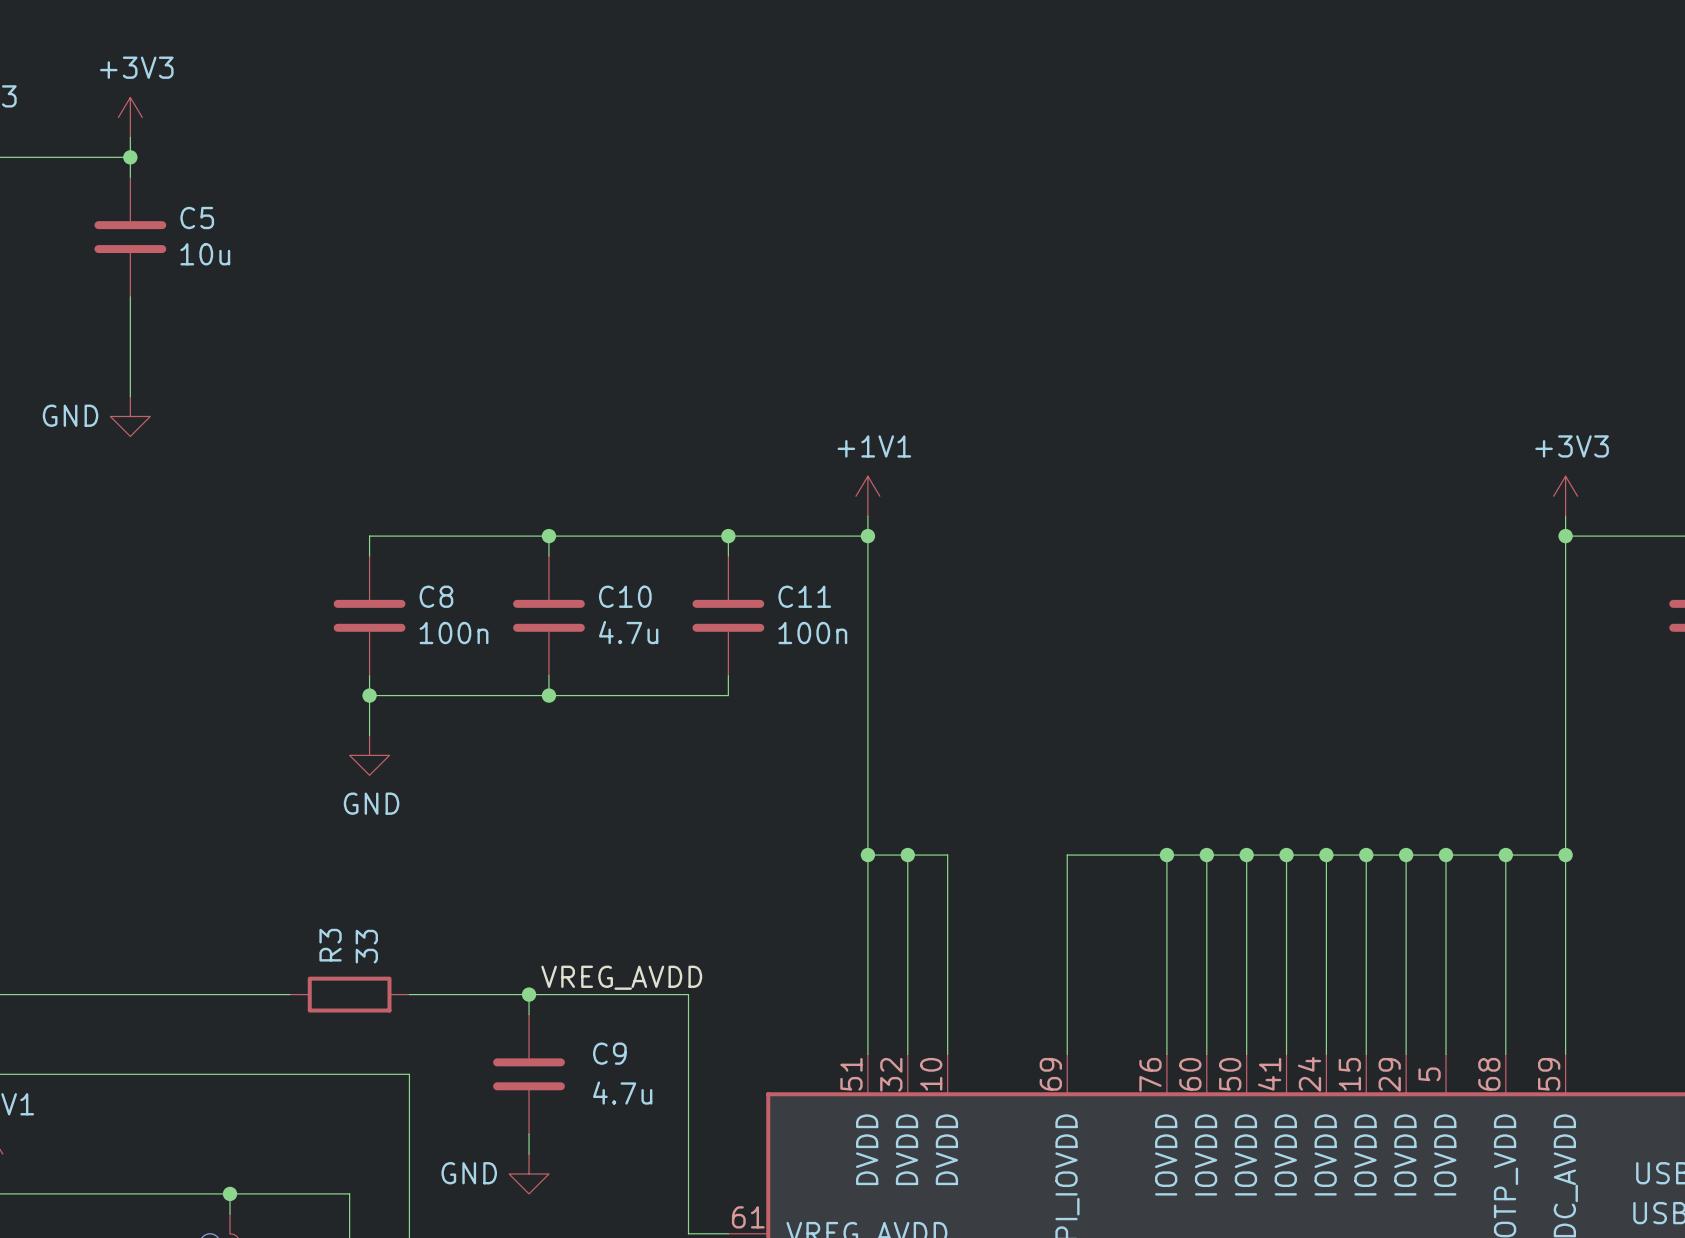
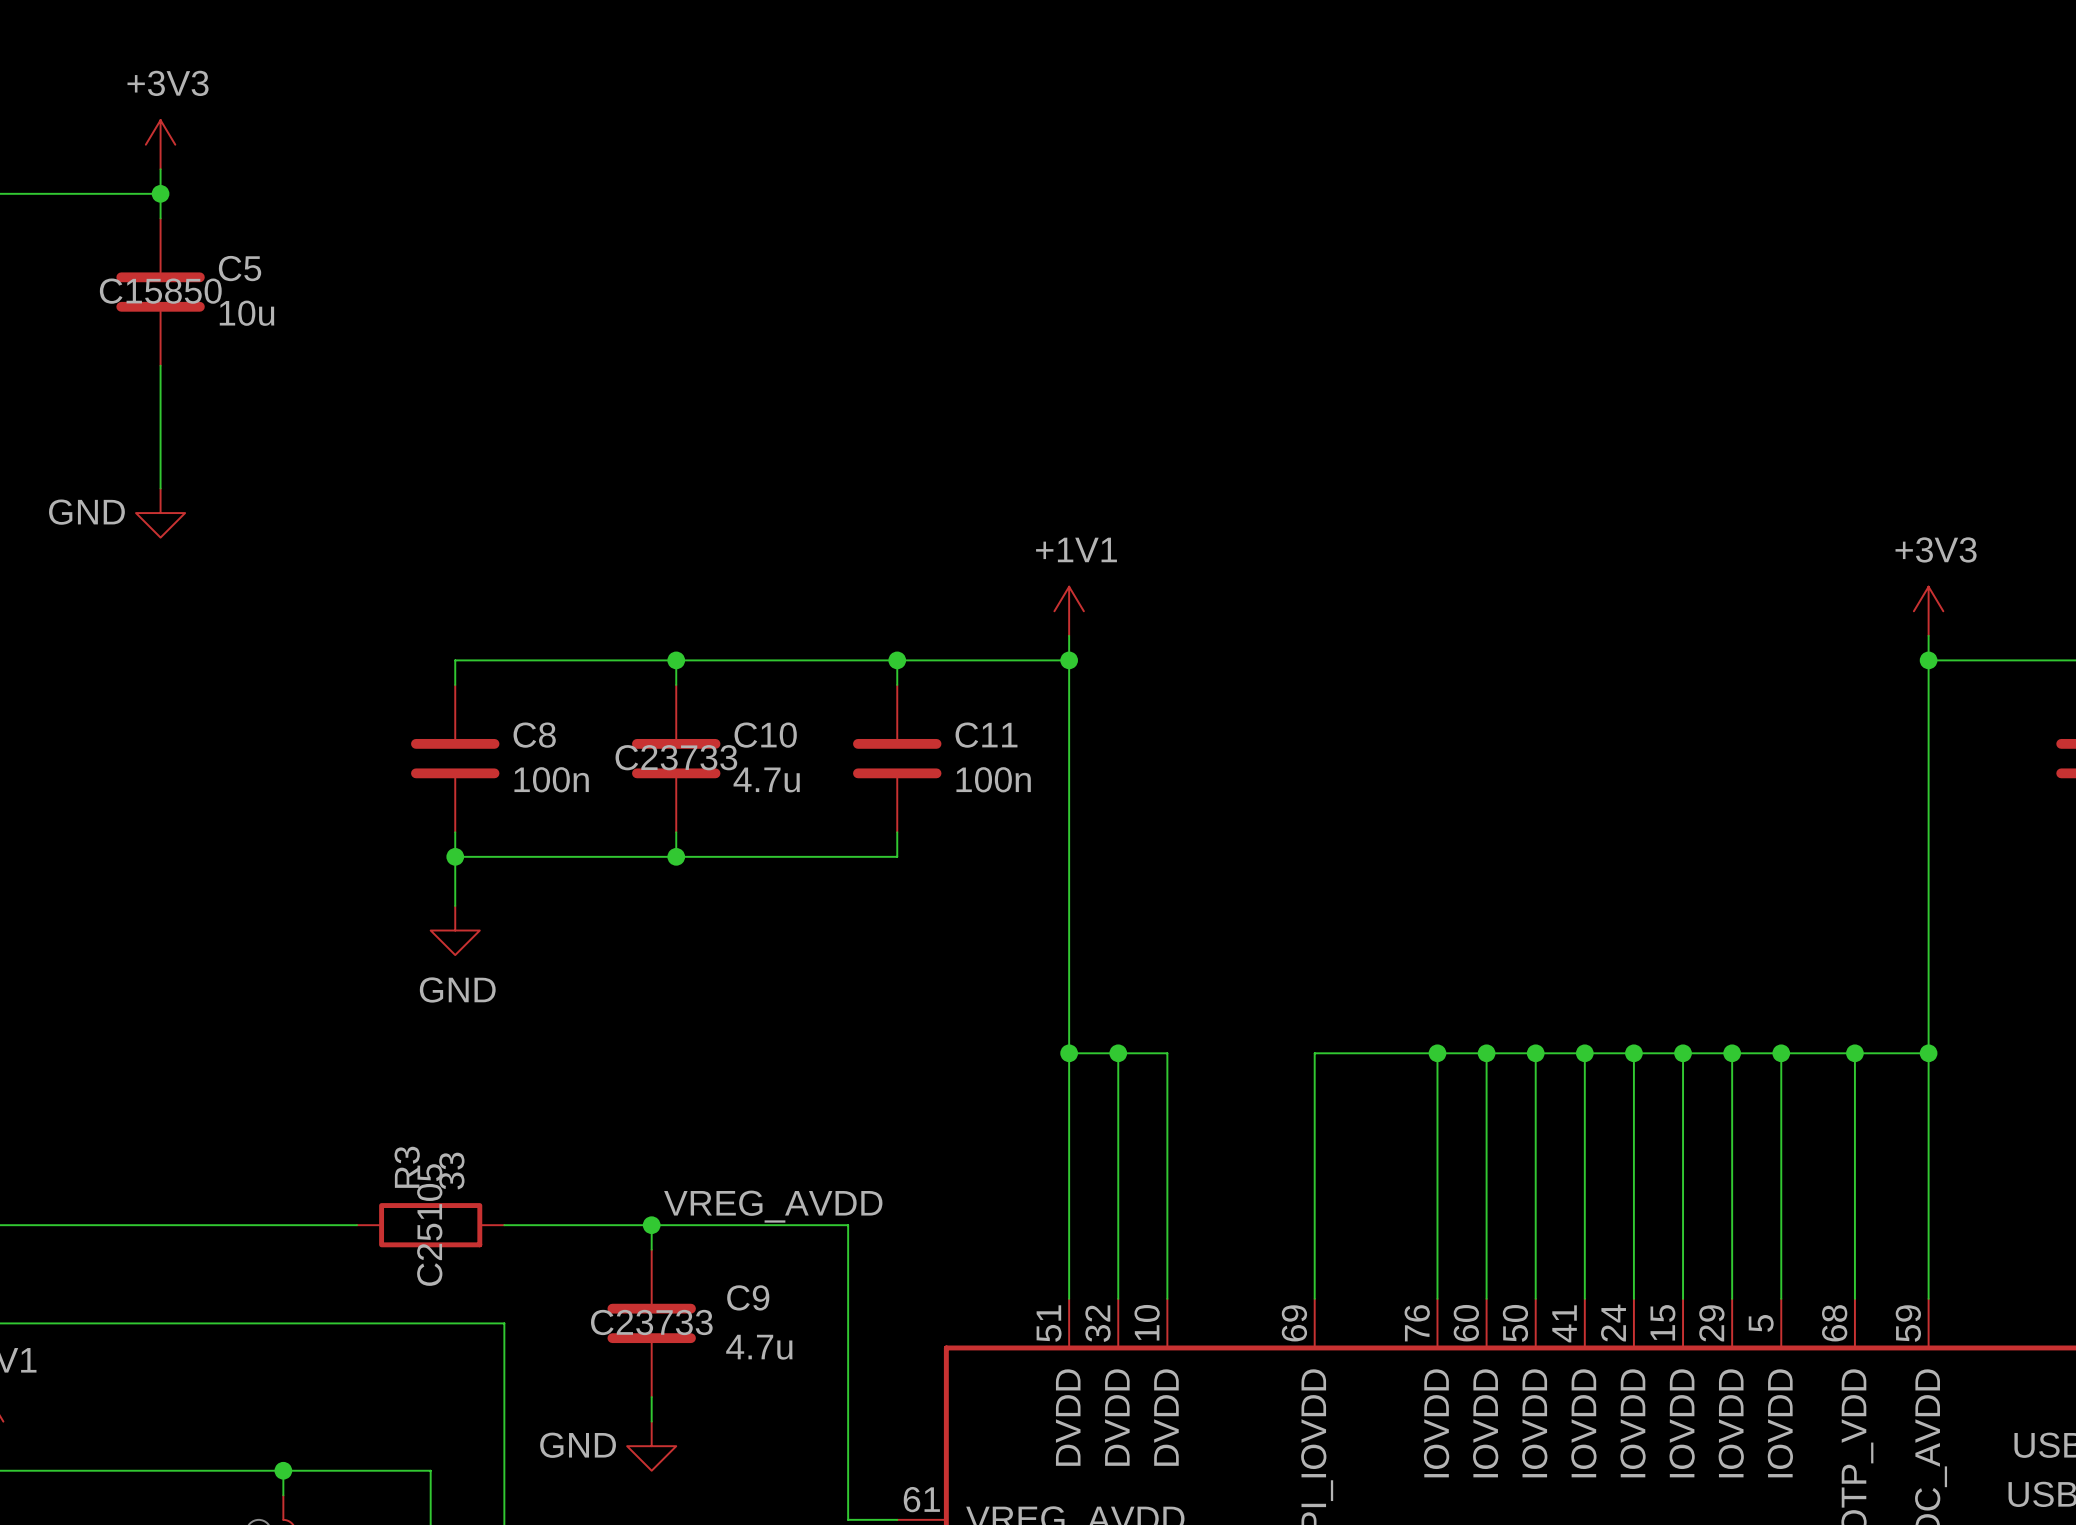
C5 text: none -> C15850 (160, 291)
C10 text: none -> C23733 (676, 757)
R3 text: none -> C25105 (429, 1225)
C9 text: none -> C23733 (651, 1322)

